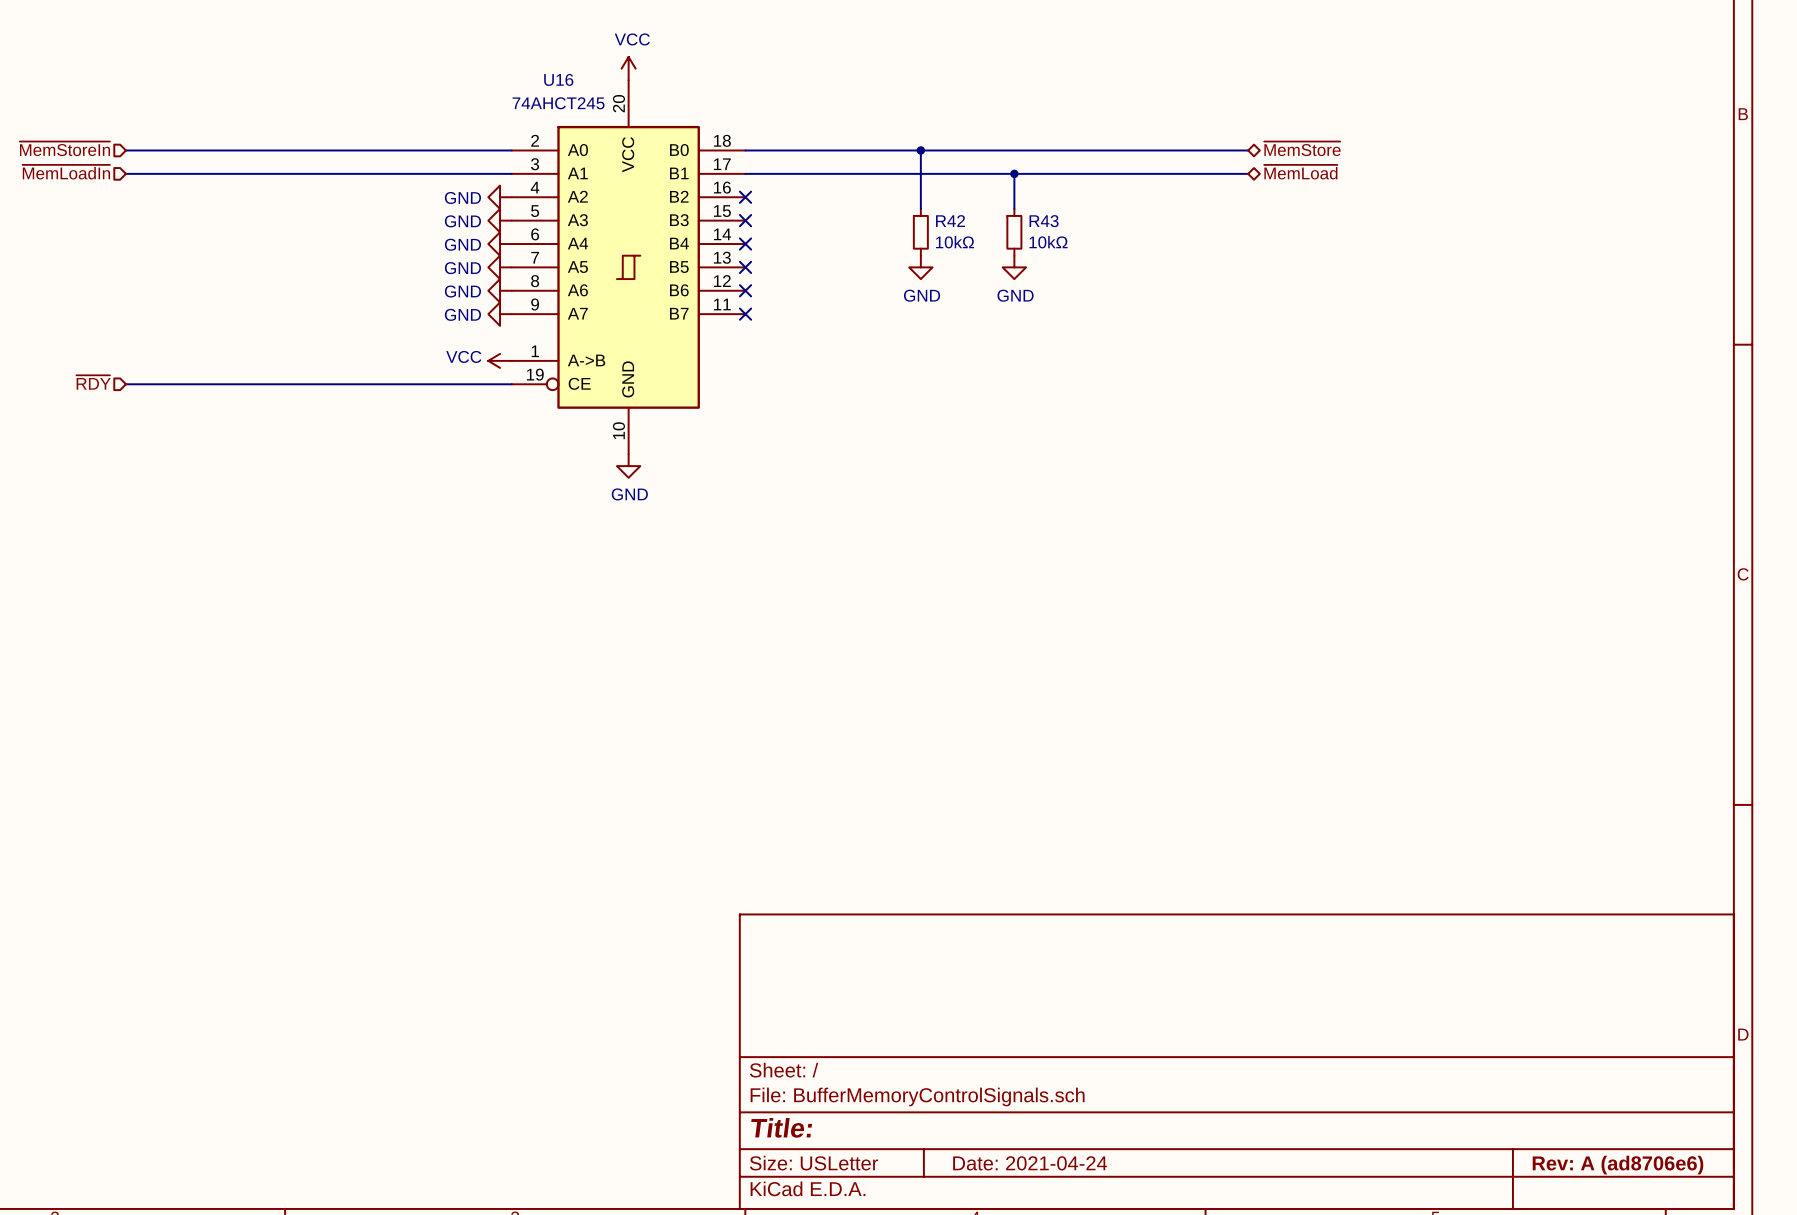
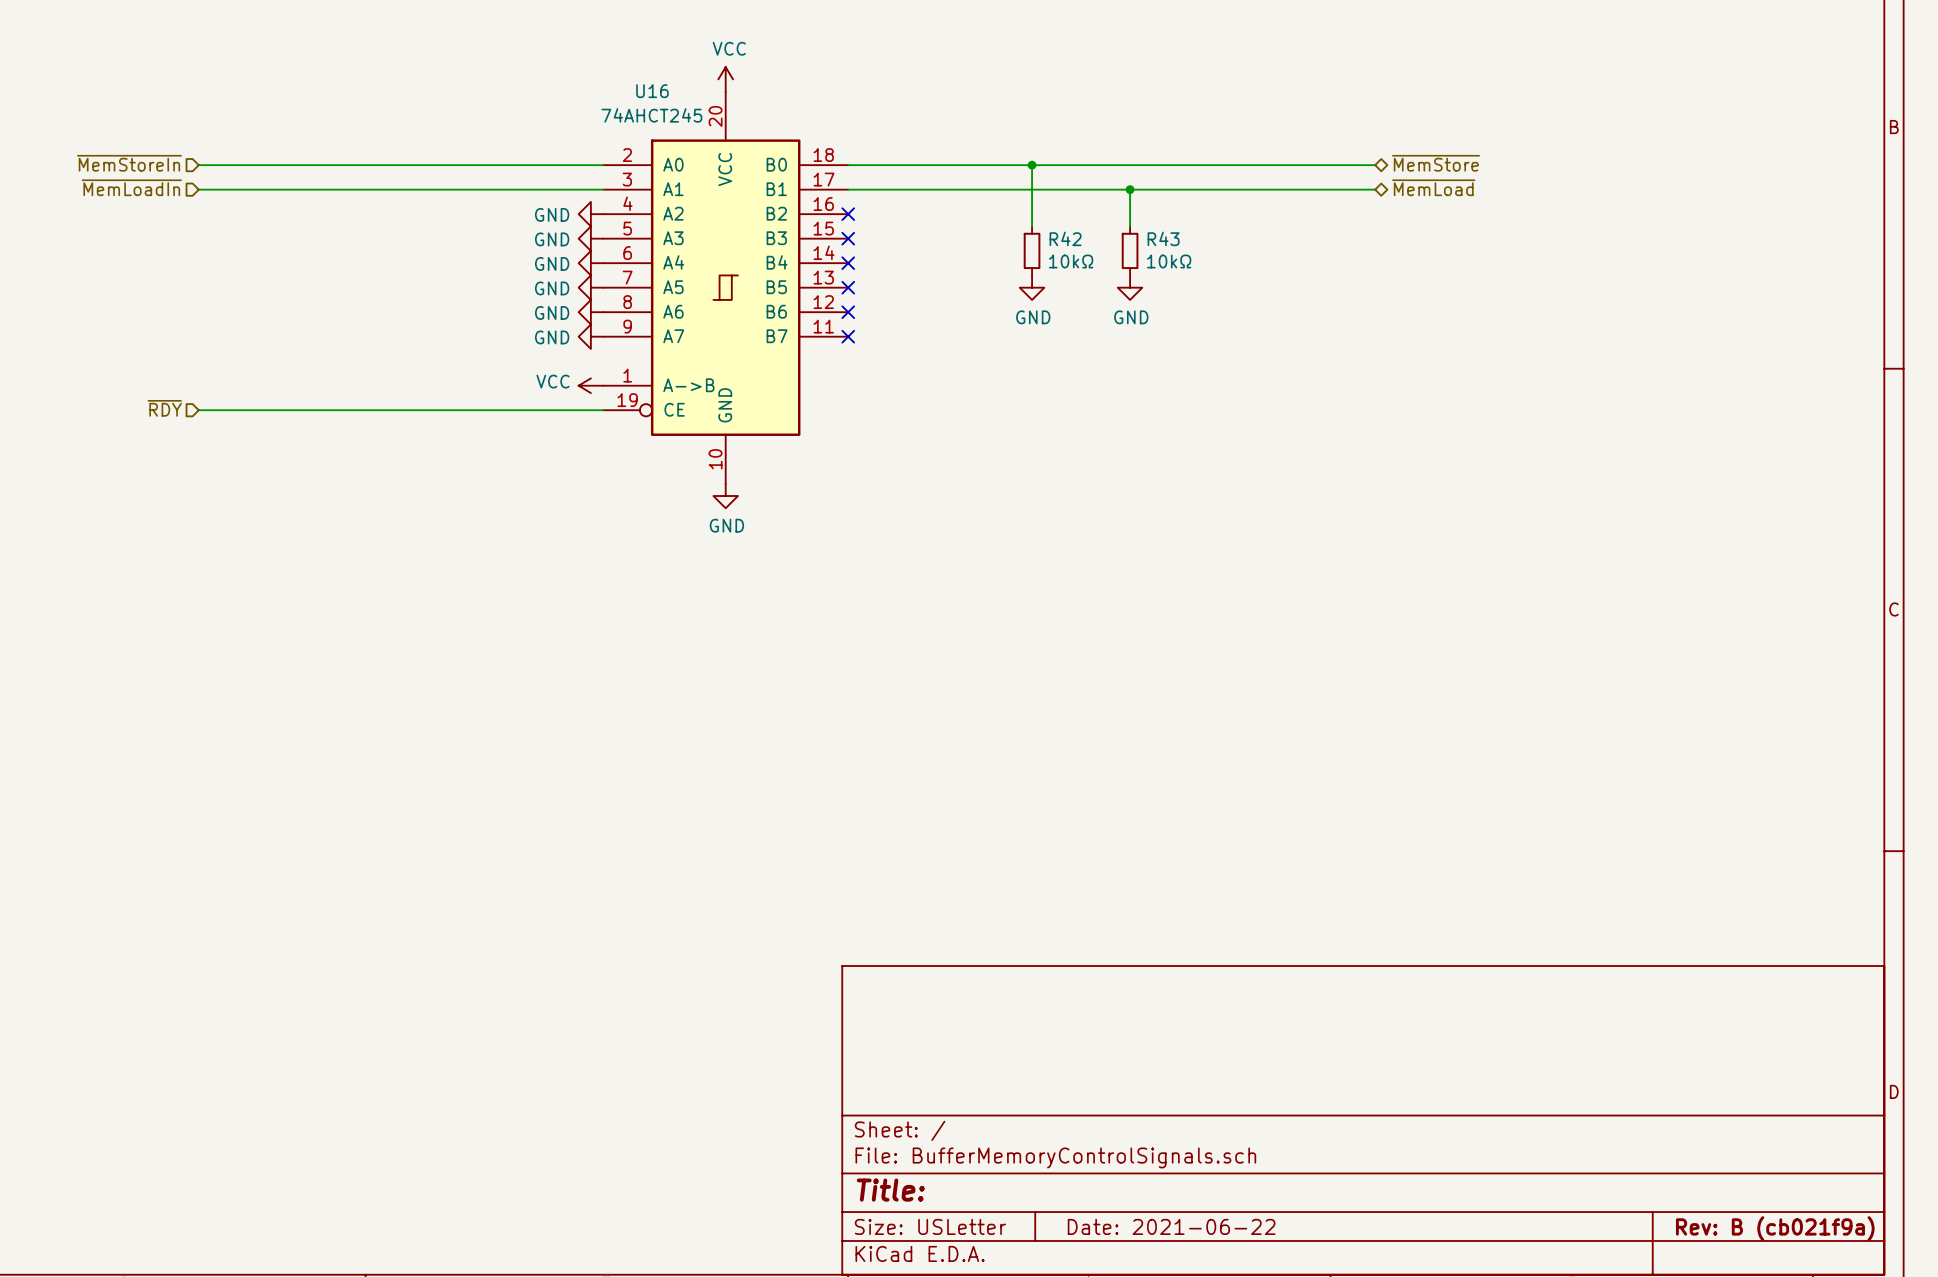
title block: Date: 2021-04-24 (1030, 1163) -> Date: 2021-06-22 (1171, 1226)
title block: Rev: A (ad8706e6) (1618, 1165) -> Rev: B (cb021f9a) (1775, 1228)

